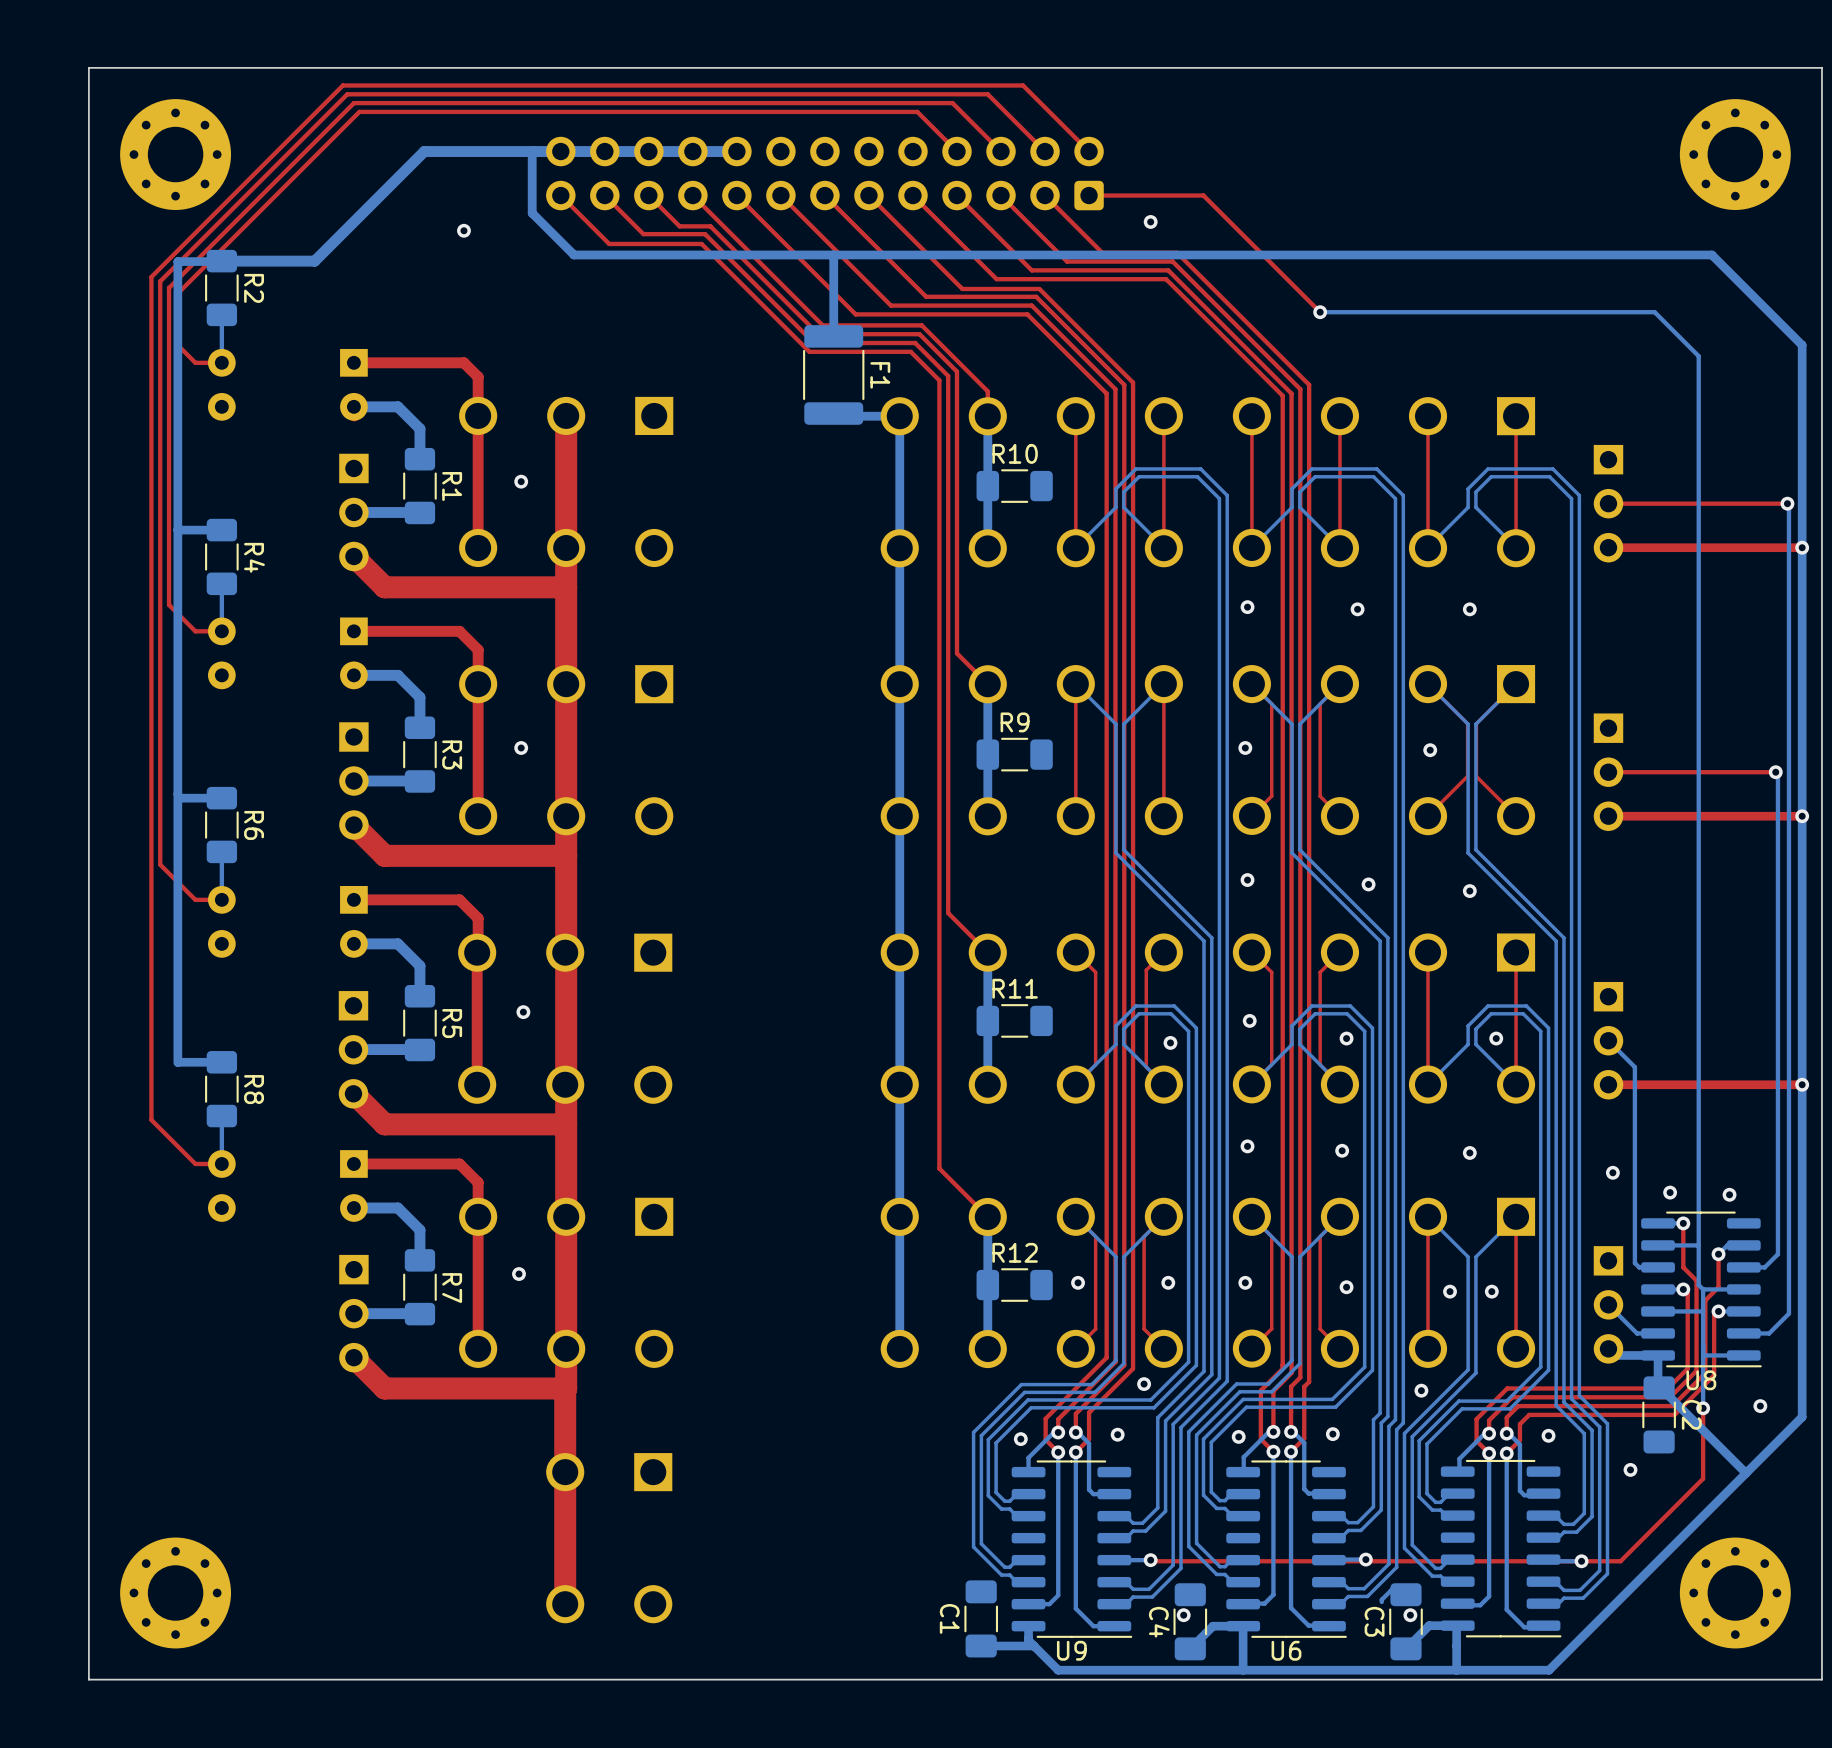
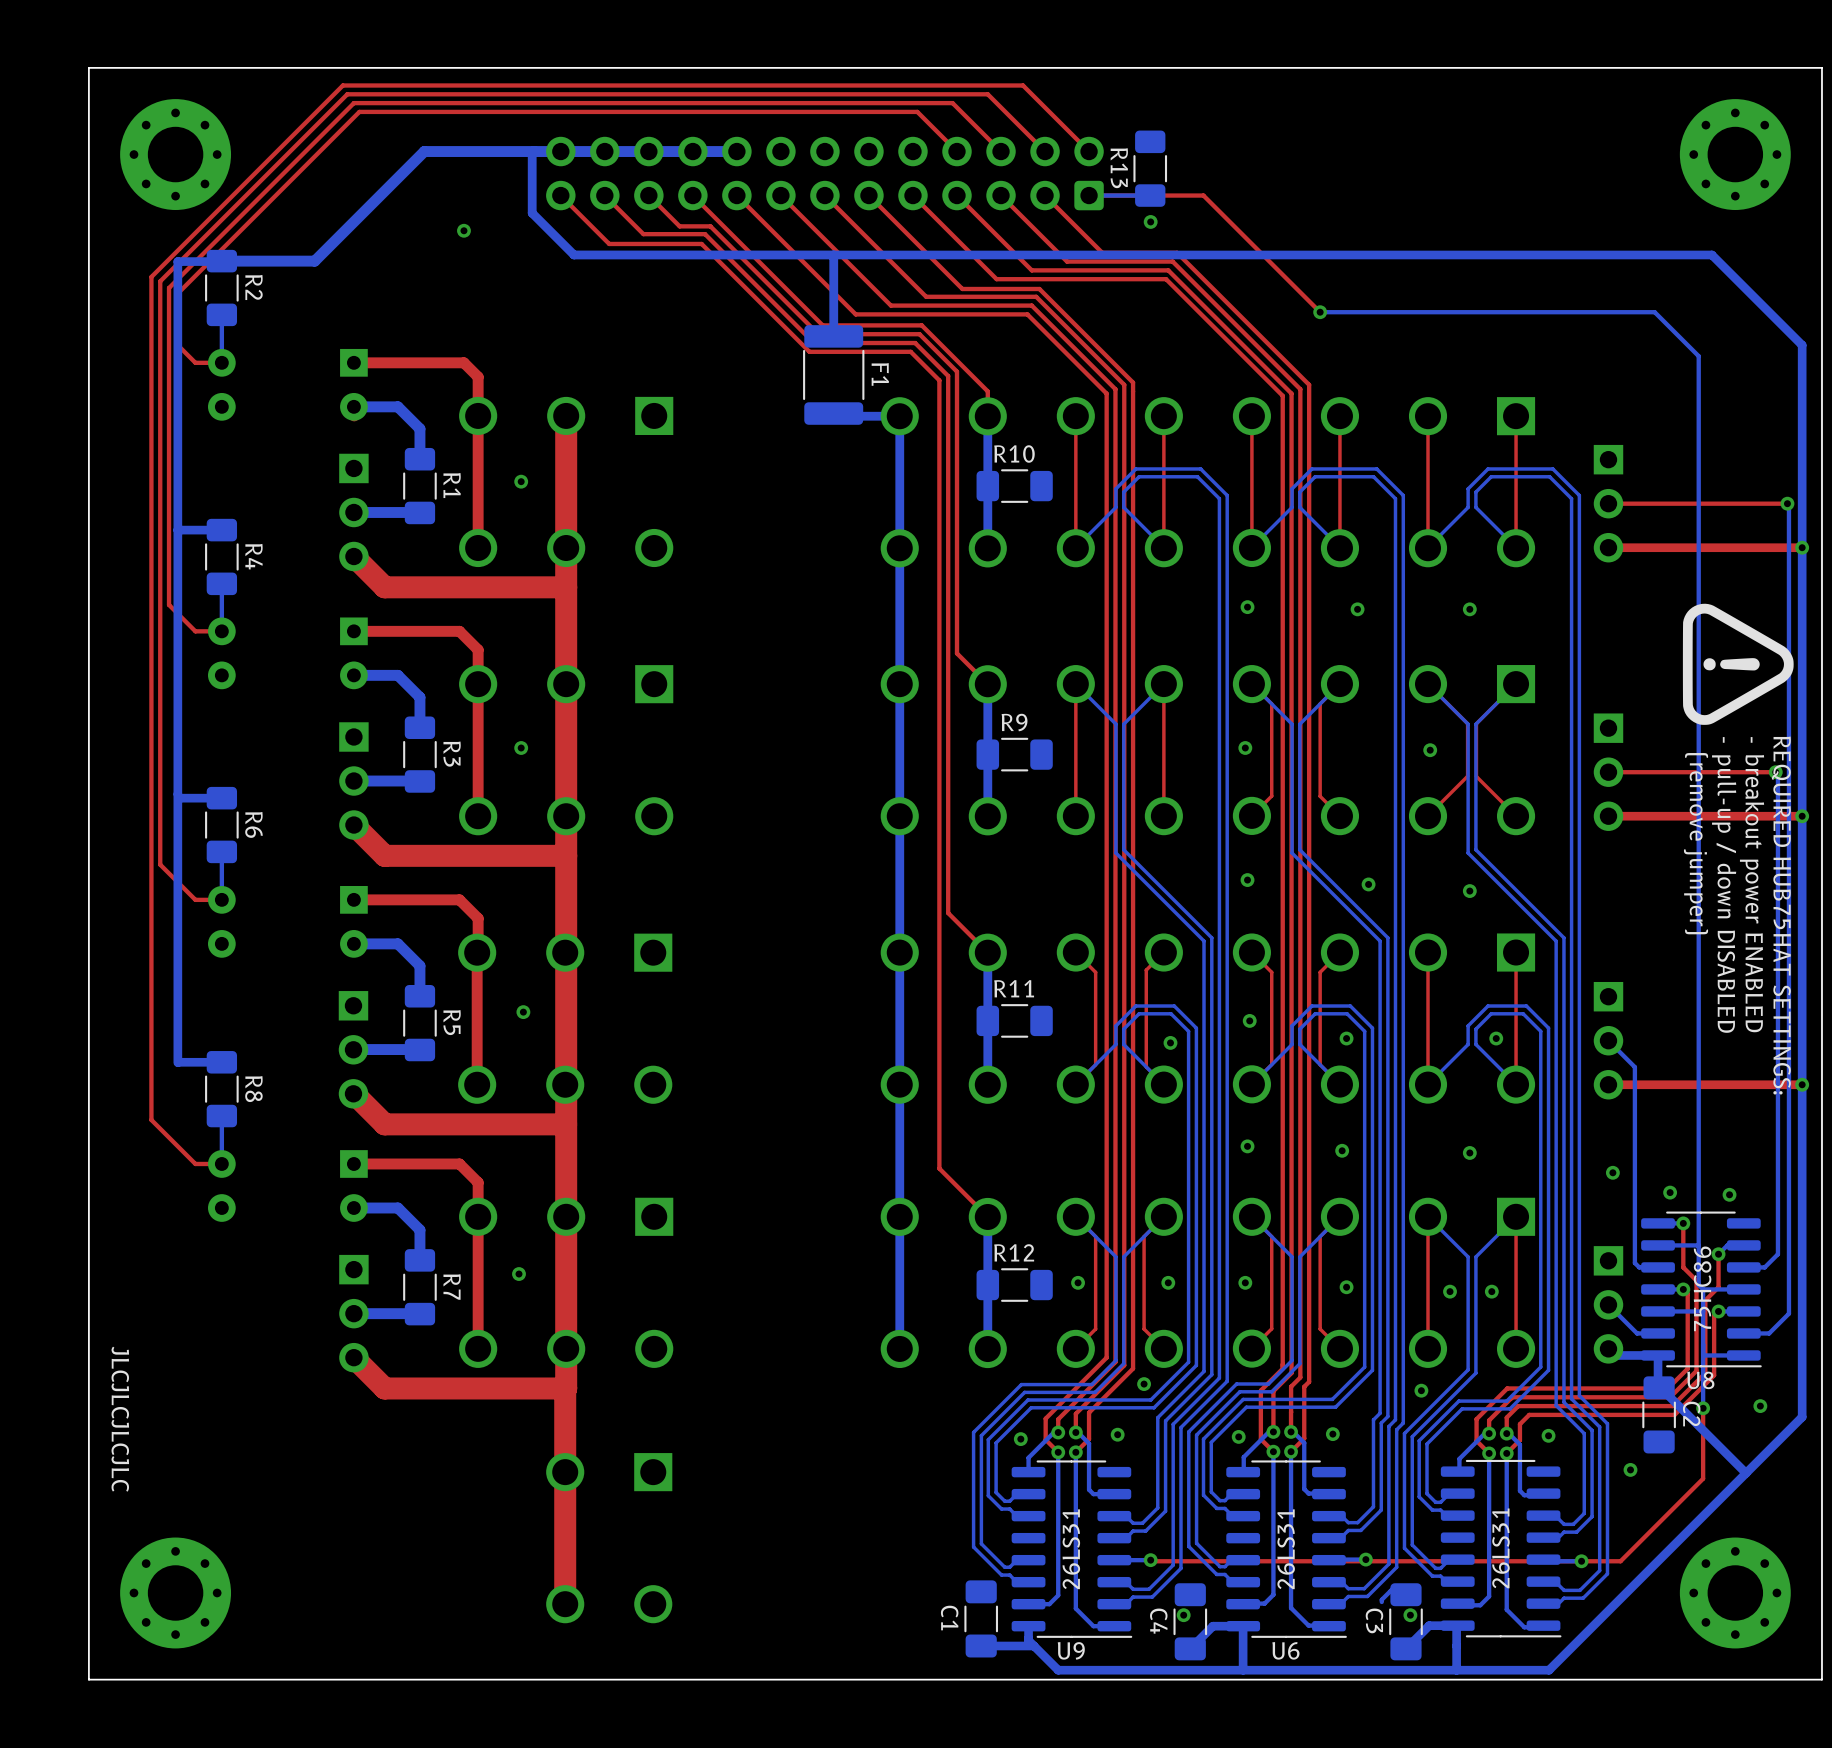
R13: none -> (1150, 168)
bottom track: none -> (1150, 195) (1089, 195)
drawing: none -> [1682, 603, 1794, 725]
text: none -> (remove jumper) (1696, 843)
text: none -> - breakout power ENABLED (1752, 884)
text: none -> - pull-up / down DISABLED (1724, 884)
text: none -> REQUIRED HUB75HAT SETTINGS: (1781, 915)
text: none -> 75HC86 (1702, 1288)
text: none -> JLCJLCJLCJLC (120, 1419)
text: none -> 26LS31 (1500, 1548)
text: none -> 26LS31 (1071, 1549)
text: none -> 26LS31 (1286, 1549)

